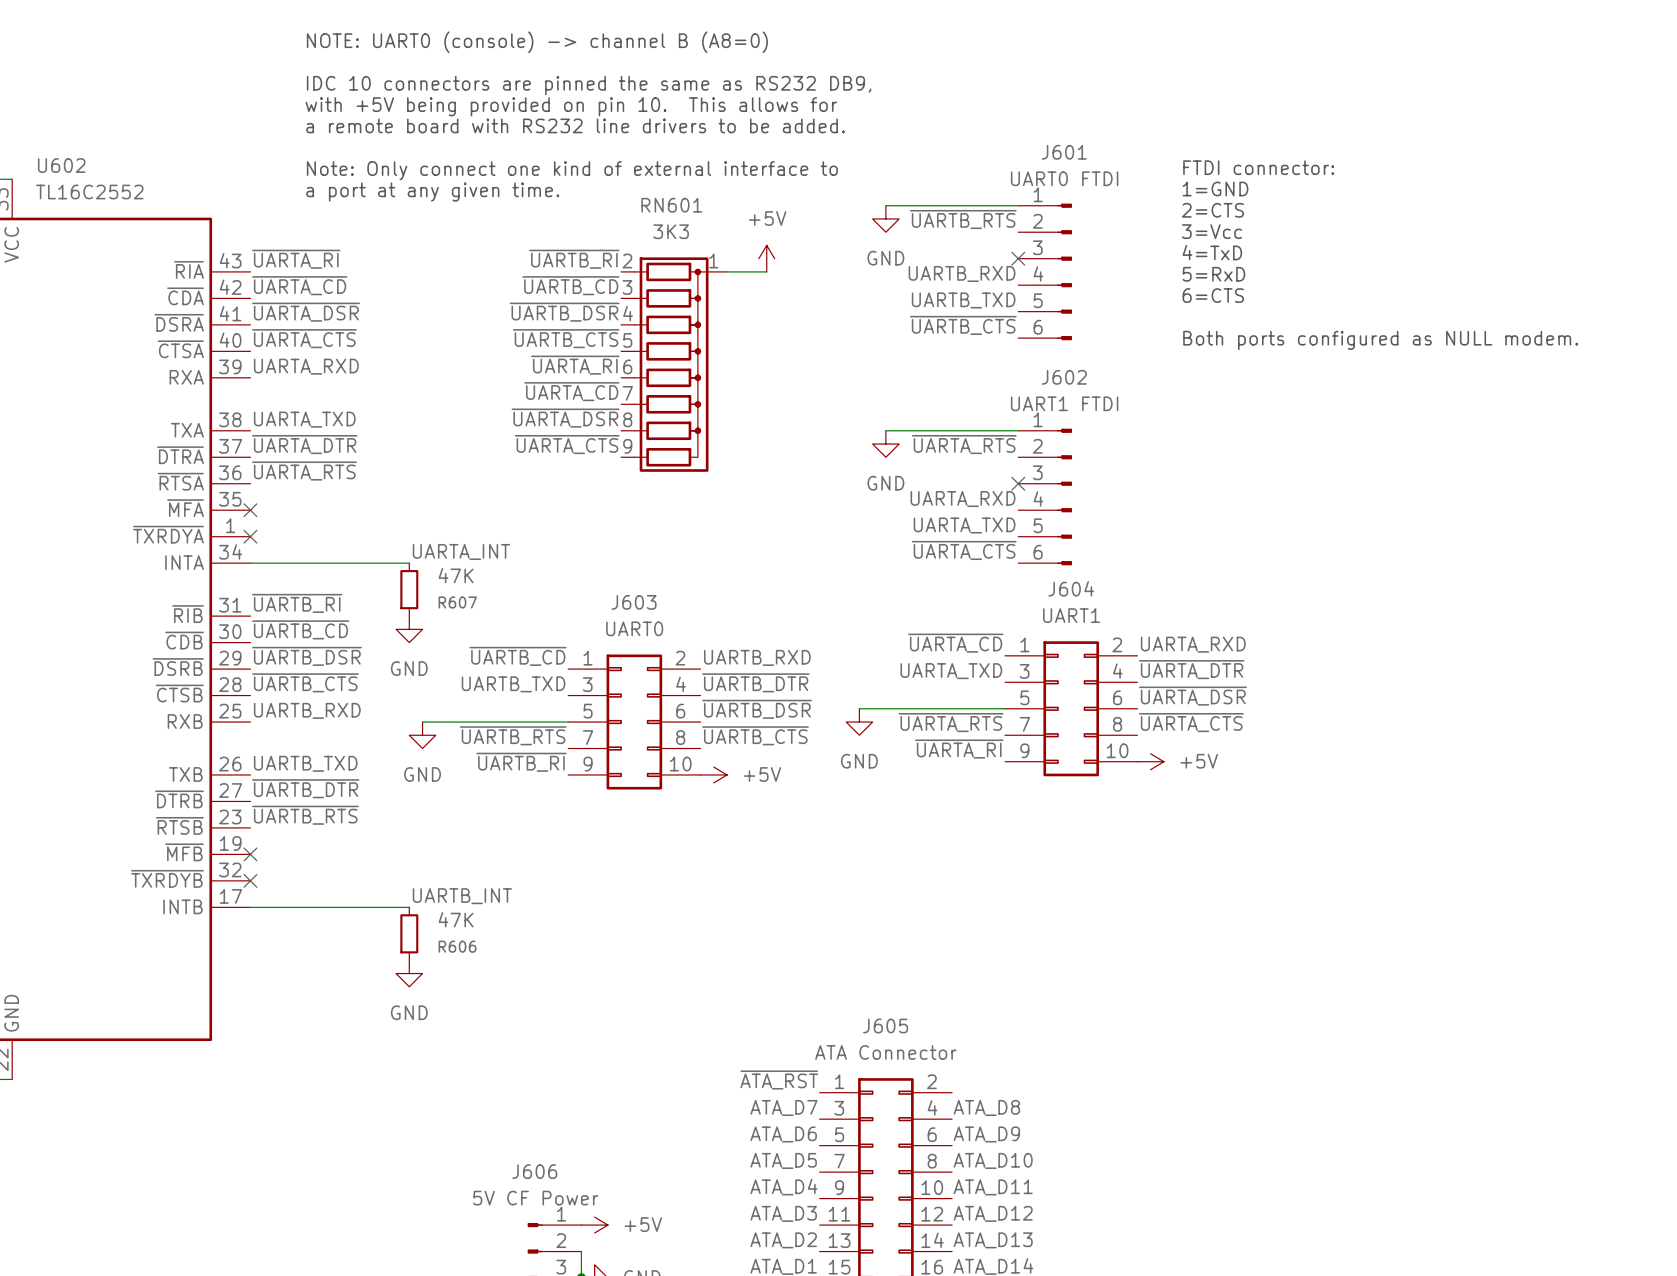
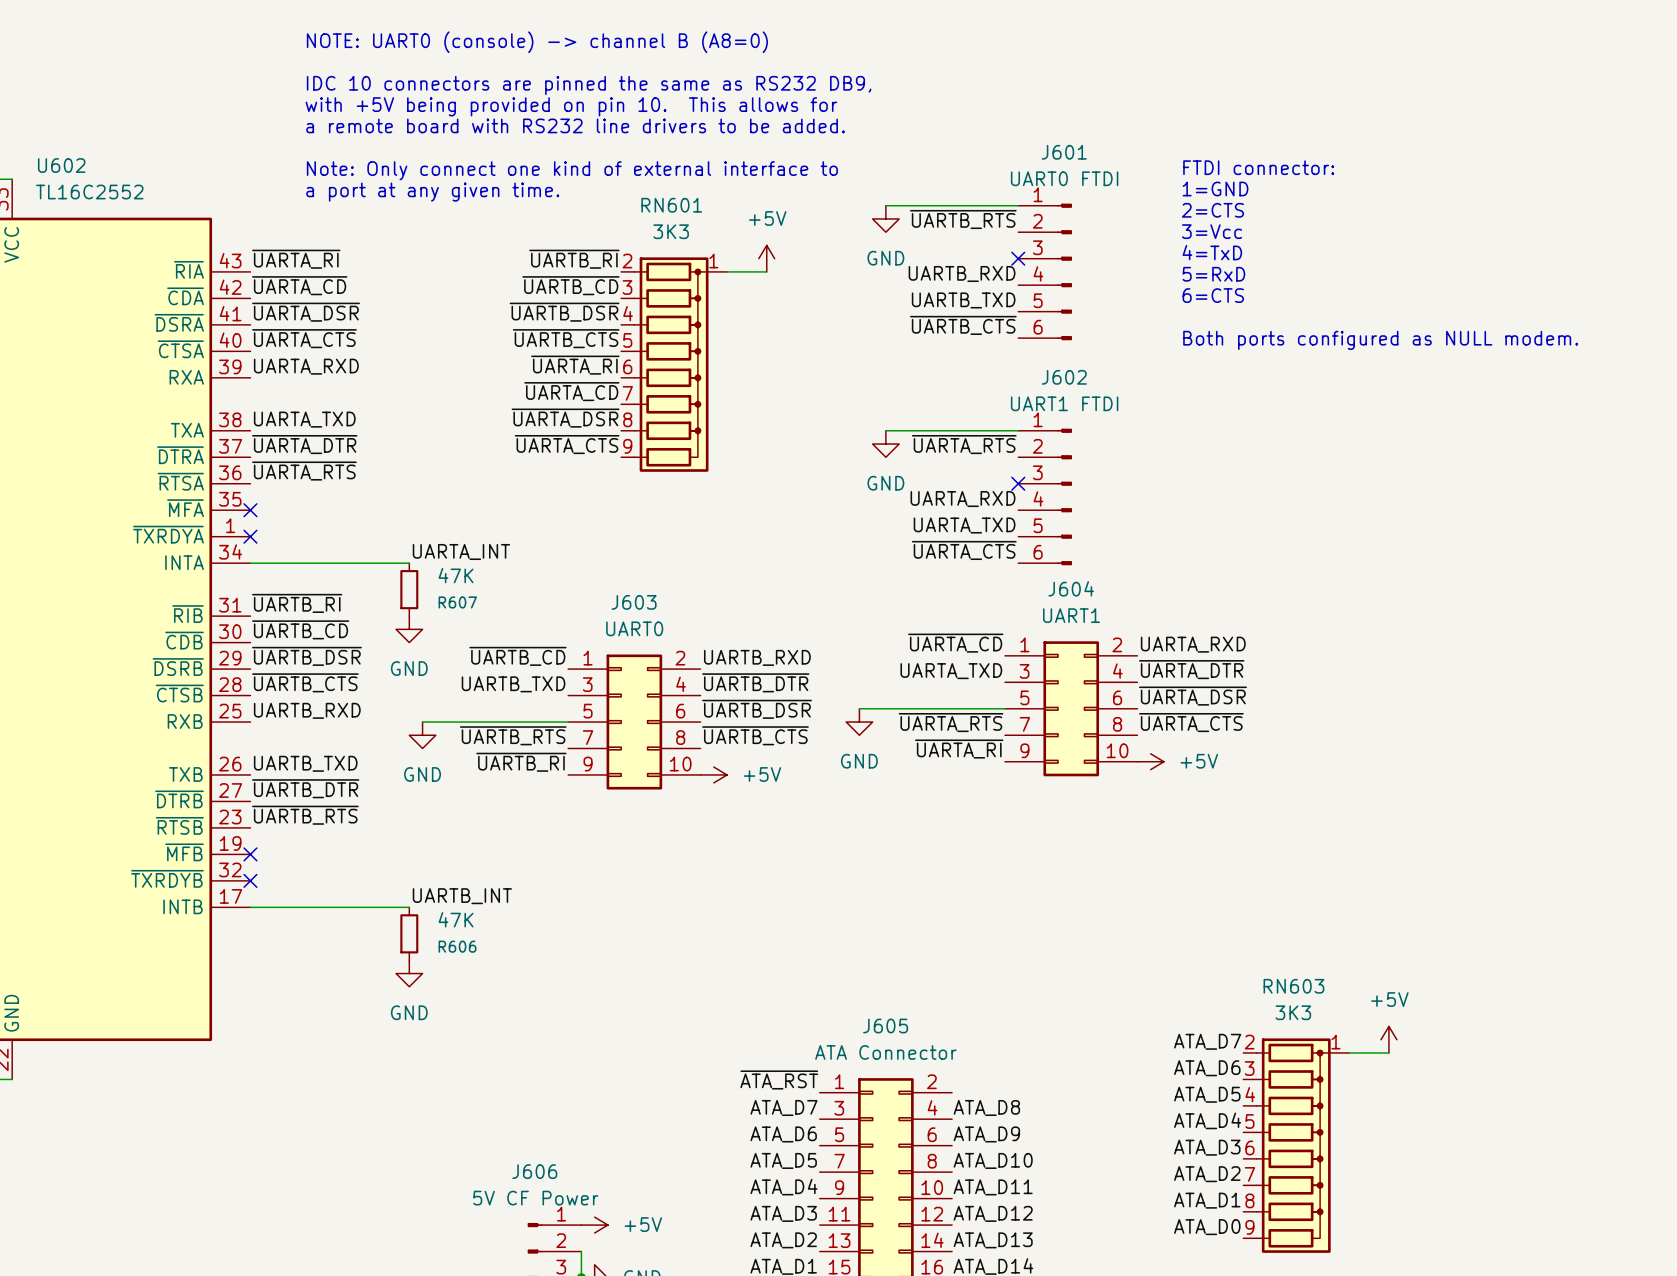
power symbol: none -> +5V (1388, 1039)
label: none -> ATA_D7 (1207, 1041)
wire: none -> (1349, 1052) (1388, 1052)
label: none -> ATA_D6 (1207, 1068)
label: none -> ATA_D5 (1207, 1094)
label: none -> ATA_D4 (1207, 1120)
RN603: none -> 3K3 (1296, 1145)
label: none -> ATA_D3 (1207, 1147)
label: none -> ATA_D2 (1207, 1174)
label: none -> ATA_D1 (1207, 1200)
label: none -> ATA_D0 (1207, 1227)

